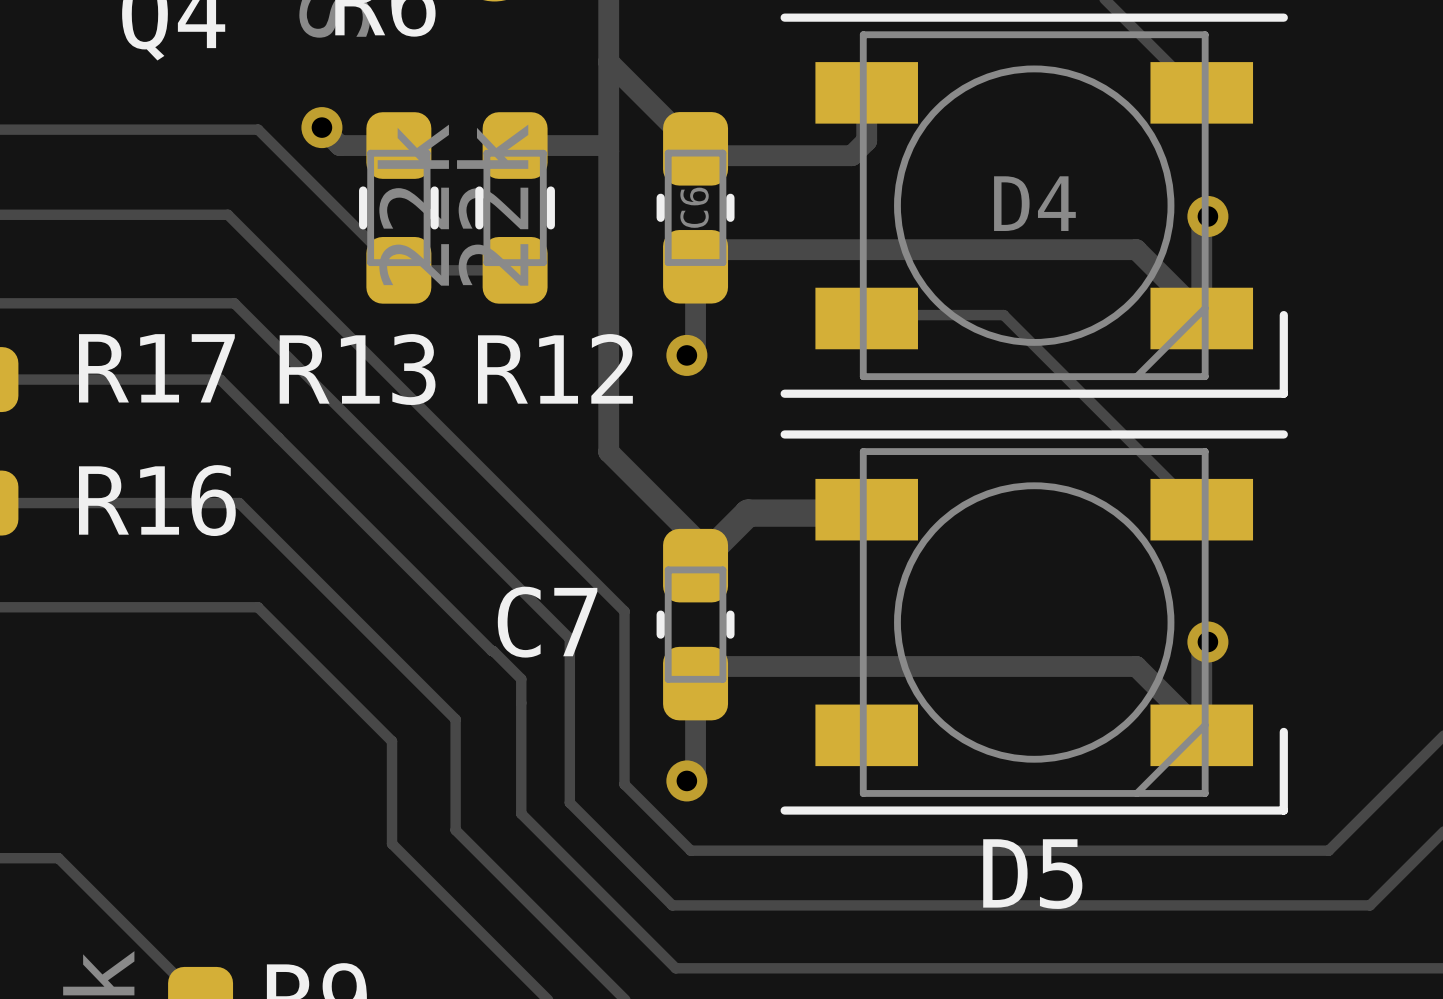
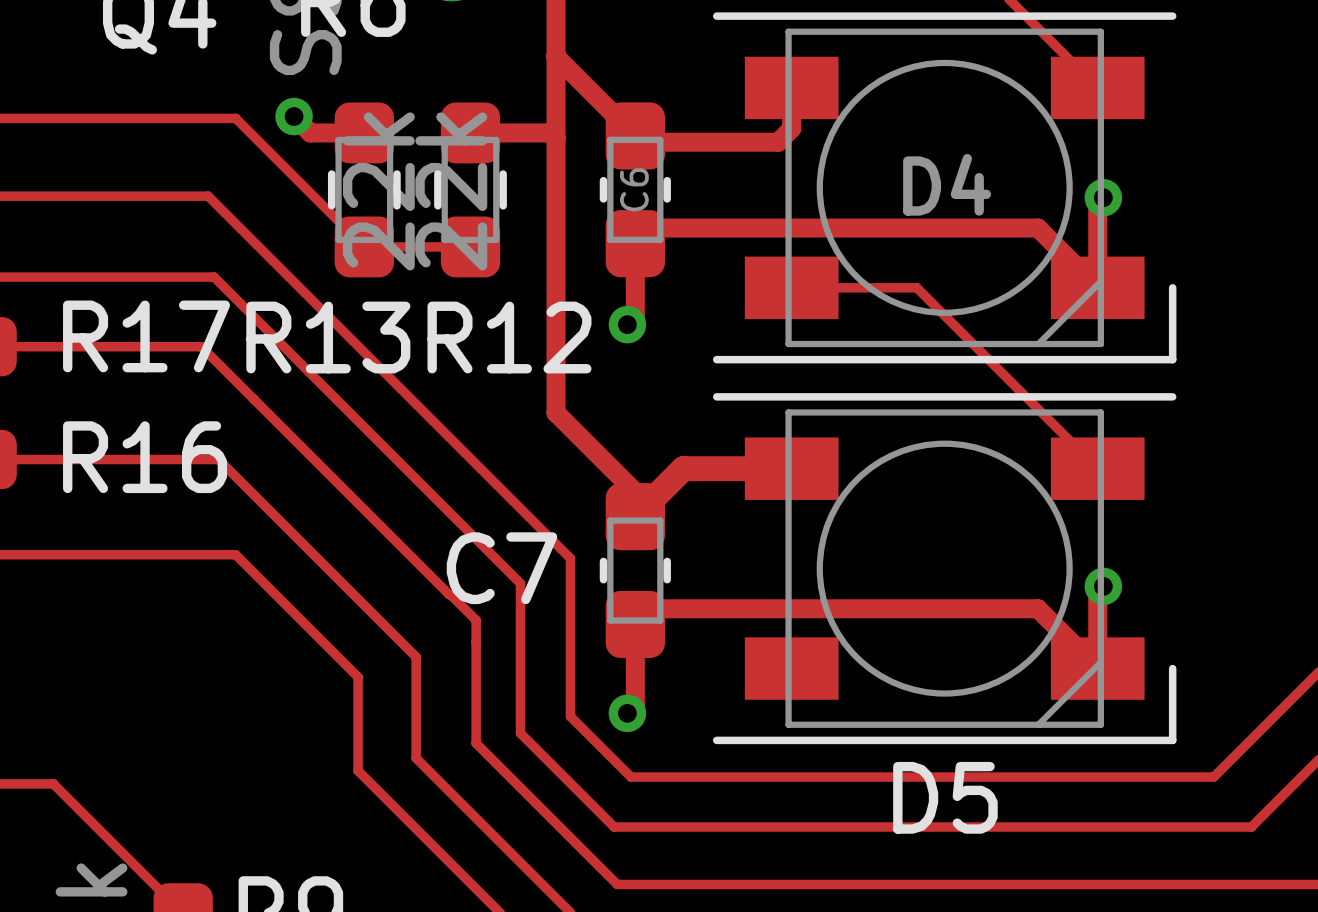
D4 footprint: [780, 13, 1288, 398] -> [712, 12, 1177, 364]
D5 footprint: [780, 430, 1288, 815] -> [712, 393, 1177, 745]

